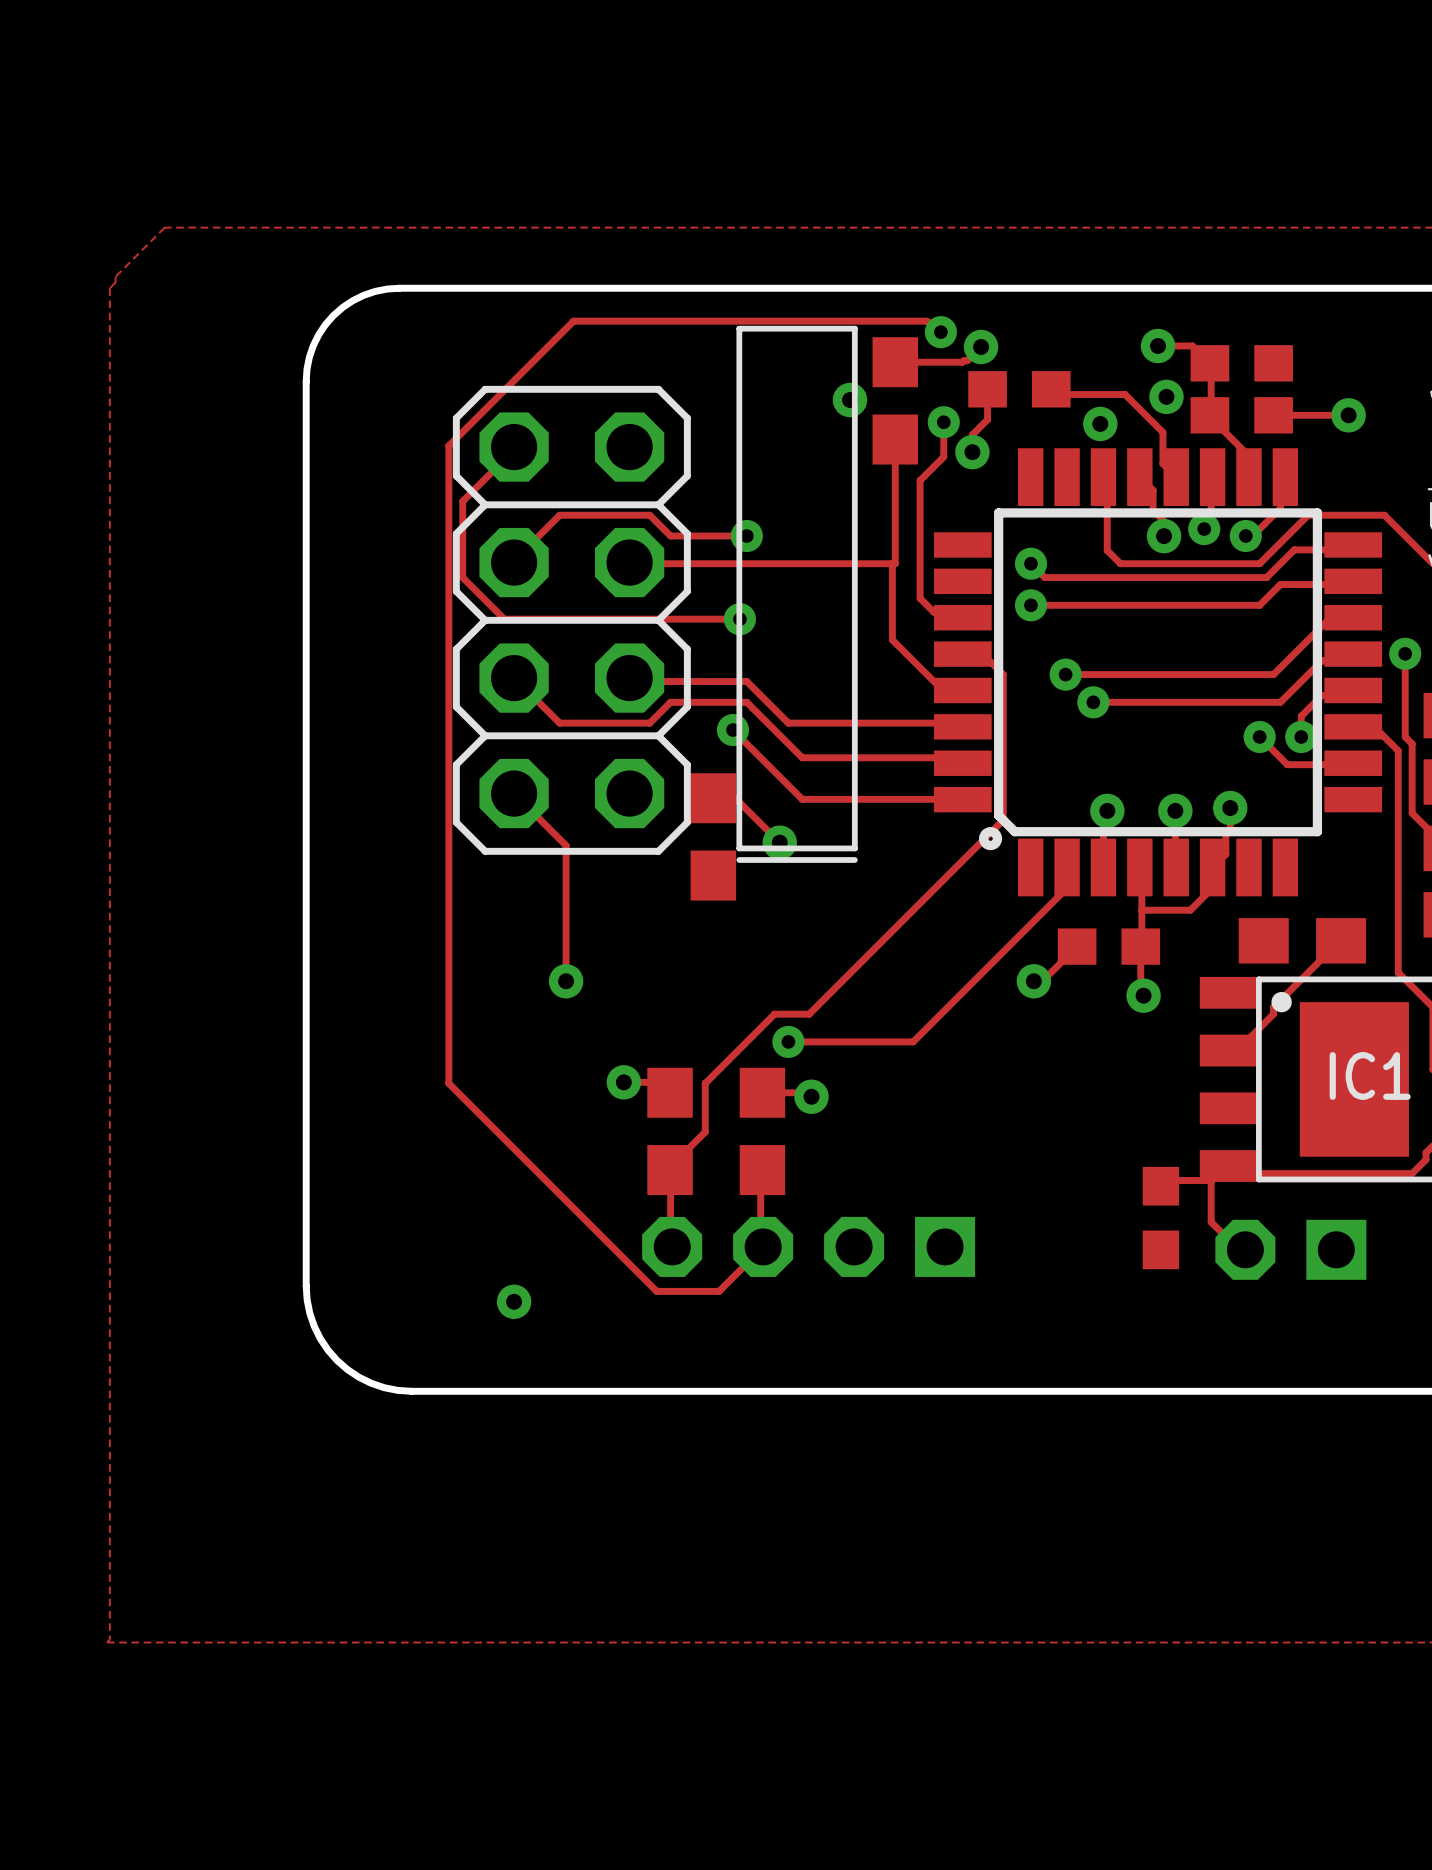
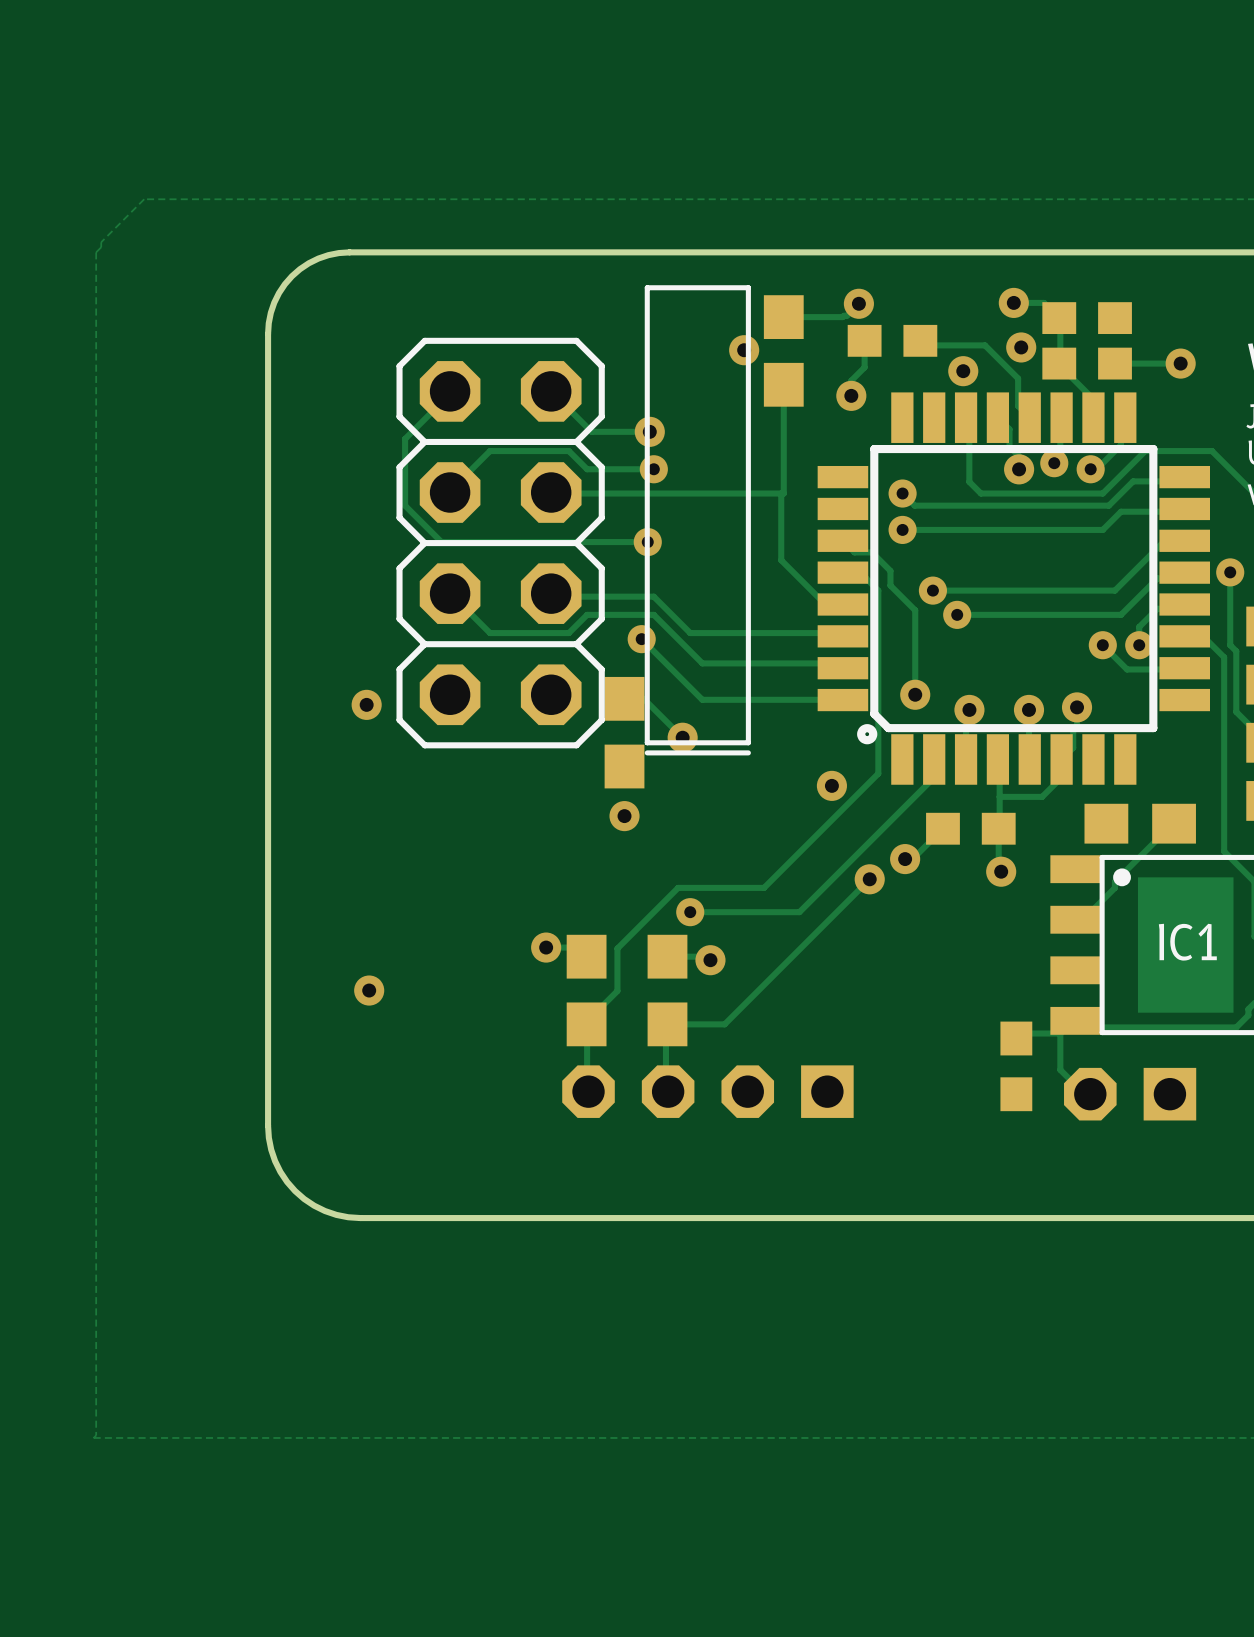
track: (940, 332) (927, 321) (573, 321) (448, 445) (448, 1083) (656, 1291) (719, 1291) (763, 1246) -> none
via: (940, 332) -> none
track: (943, 422) (943, 456) (920, 480) (920, 598) (933, 612) (961, 612) (962, 617) -> (915, 694) (915, 610) (890, 585) (890, 570) (871, 552) (854, 552) (842, 540)
via: (943, 422) -> none
track: none -> (551, 391) (591, 431) (649, 431)
via: none -> (649, 431)
track: (514, 793) (566, 845) (566, 981) -> none
via: none -> (915, 694)
via: none -> (366, 704)
track: (1003, 820) (809, 1014) -> (878, 718) (878, 773) (764, 887) (708, 887)
via: none -> (831, 785)
via: none -> (624, 816)
via: (566, 981) -> none
track: none -> (869, 879) (724, 1024) (667, 1024)
via: none -> (869, 879)
via: none -> (369, 990)
via: (514, 1301) -> none

